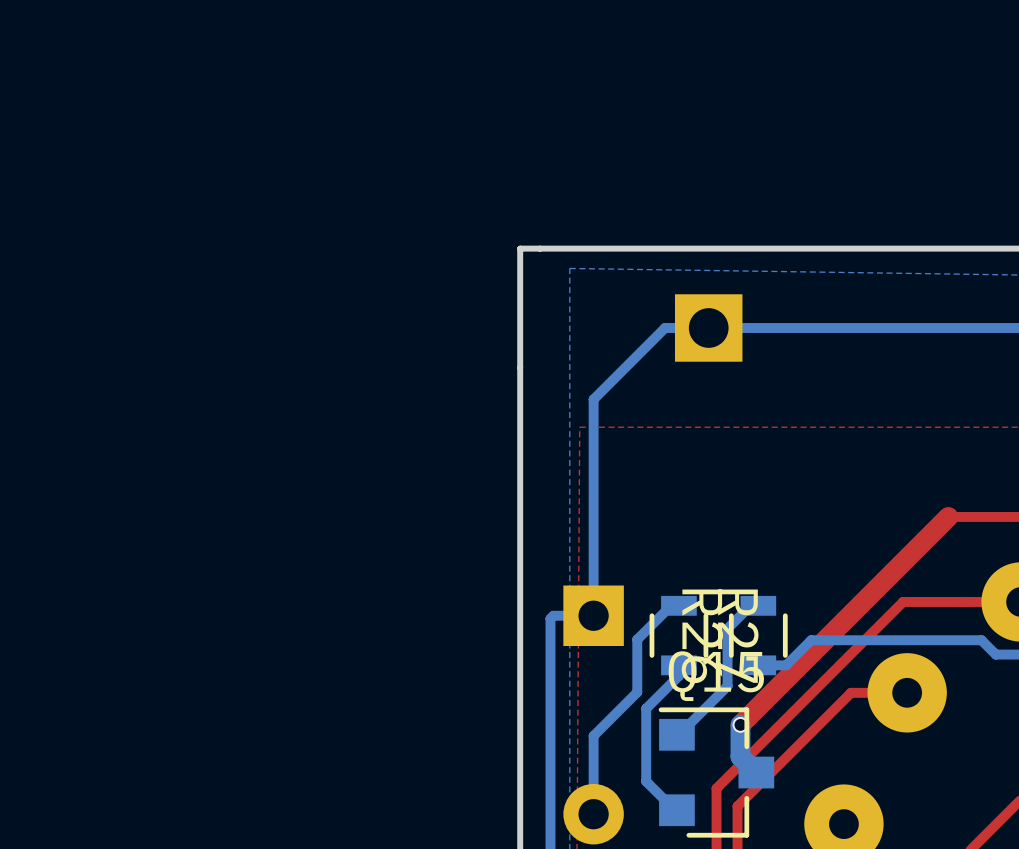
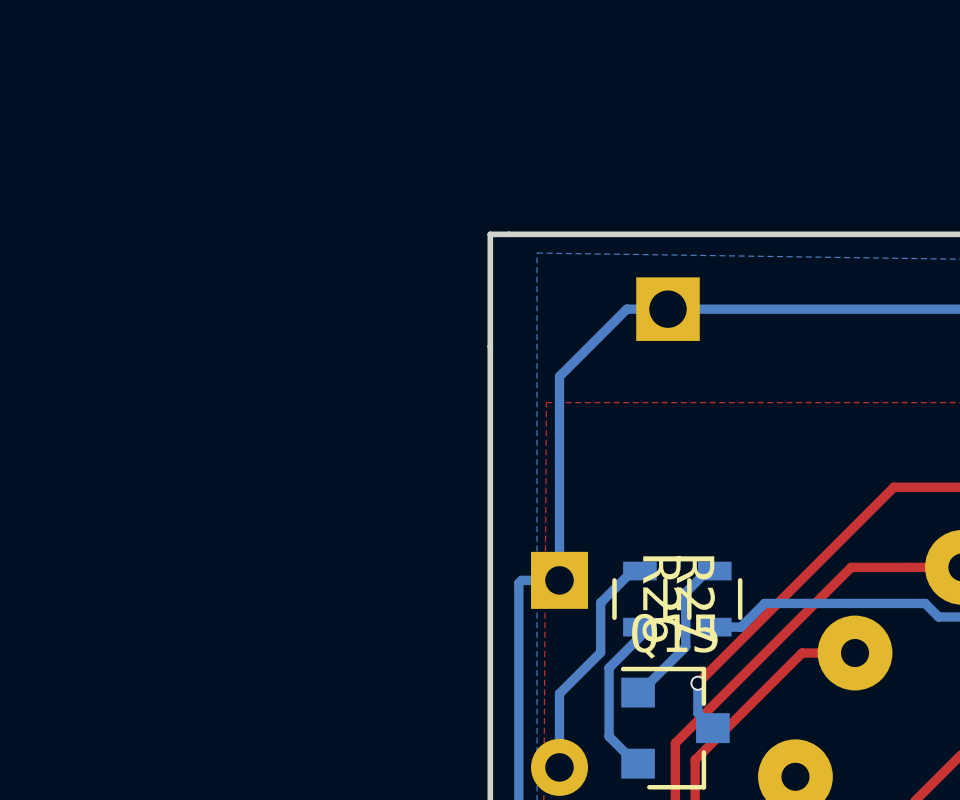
top track width: thick (948, 516) (740, 724) -> thin (893, 487) (697, 683)
bottom track width: thick (740, 724) (740, 756) (756, 772) -> thin (697, 683) (697, 713) (712, 728)

